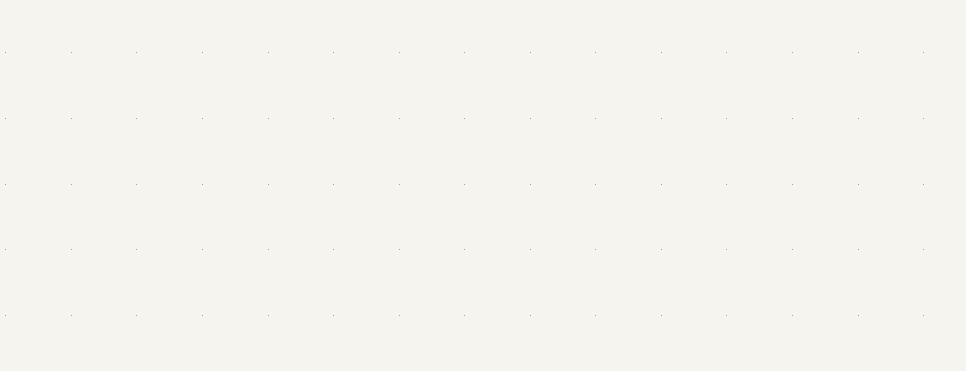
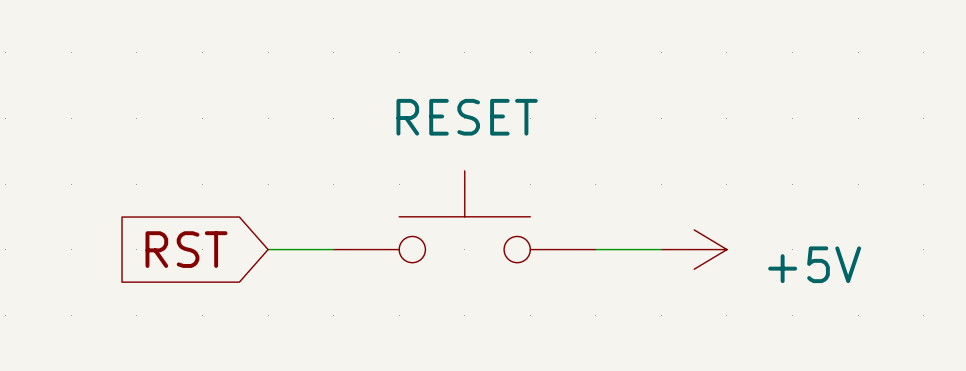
part: none -> RESET (464, 216)
global label: none -> RST (186, 249)
wire: none -> (268, 249) (333, 249)
wire: none -> (595, 249) (661, 249)
power symbol: none -> +5V (694, 249)

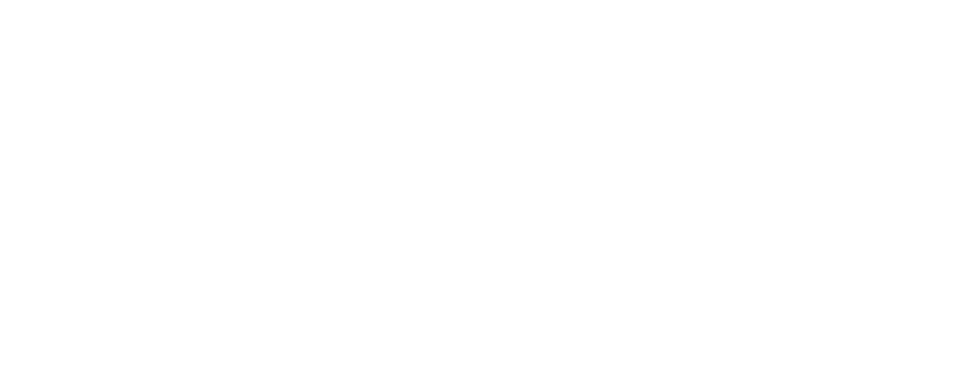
part: RESET (464, 216) -> none
global label: RST (186, 249) -> none
wire: (268, 249) (333, 249) -> none
wire: (595, 249) (661, 249) -> none
power symbol: +5V (694, 249) -> none

